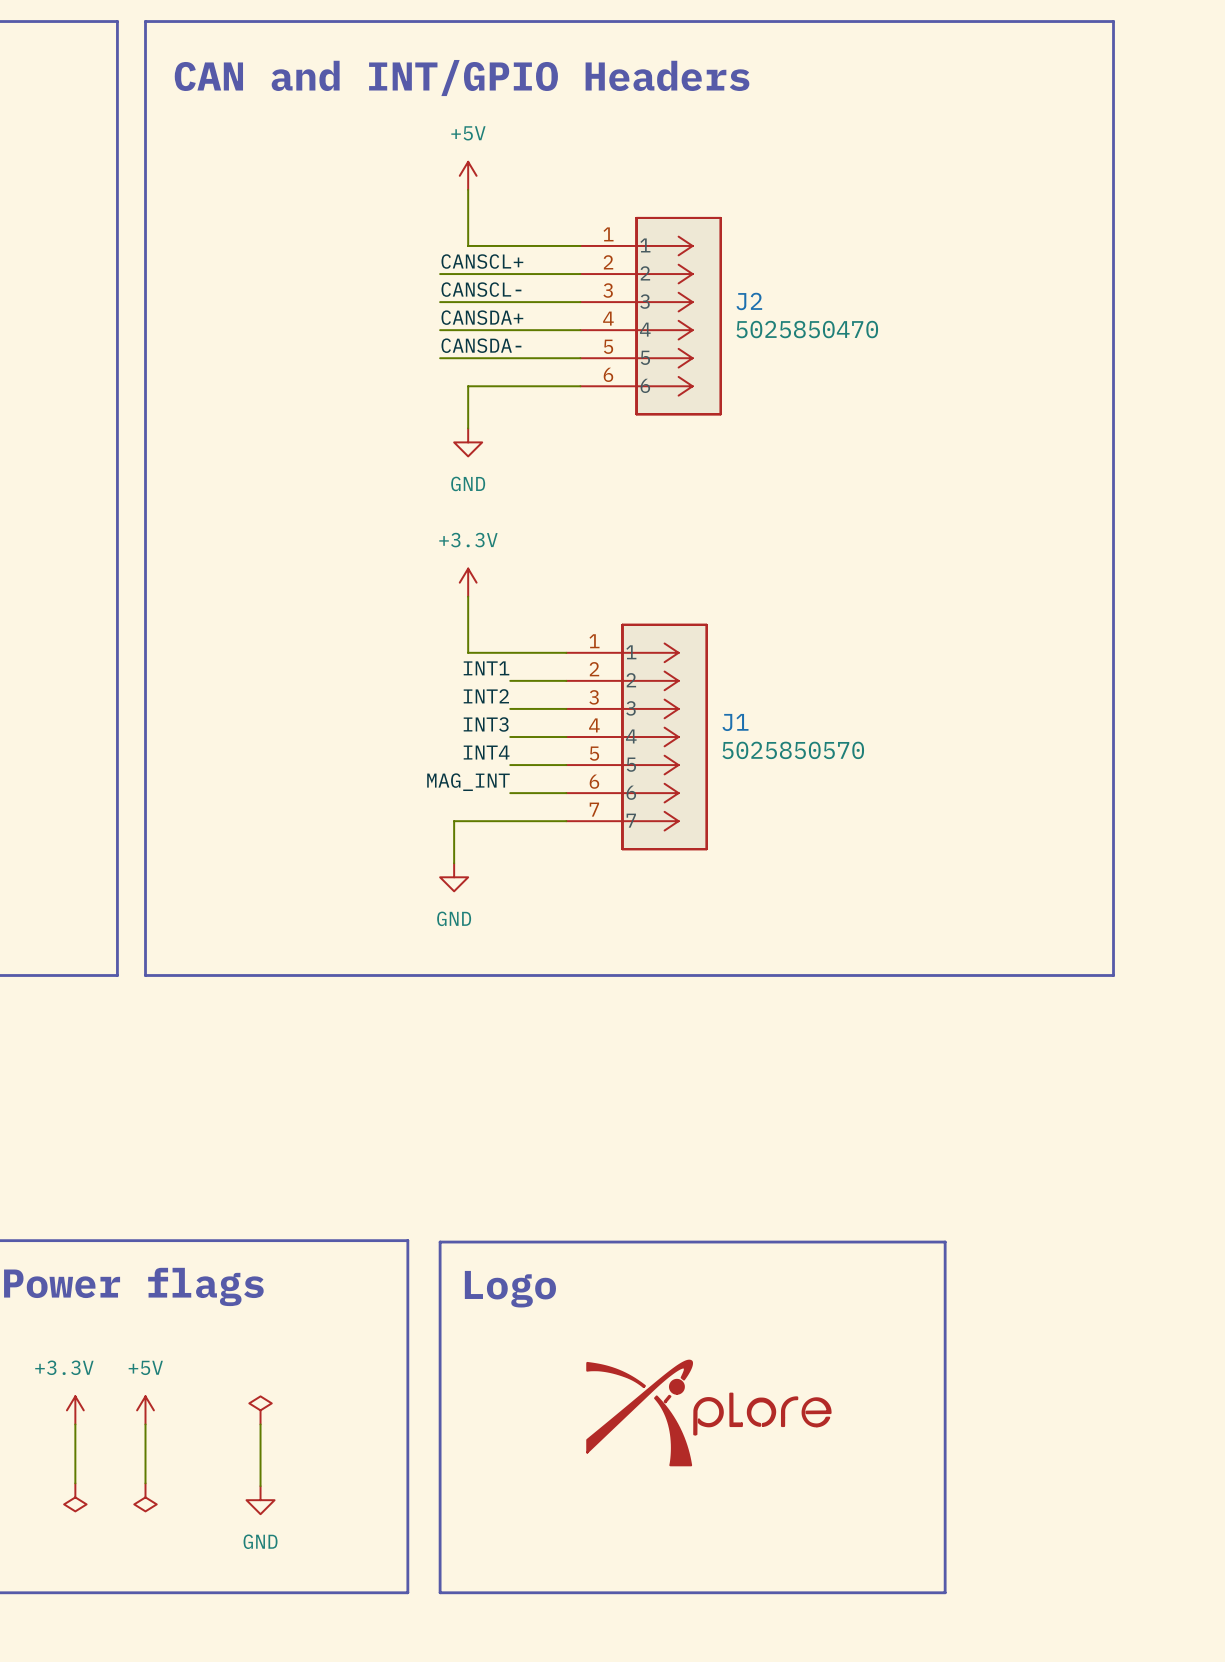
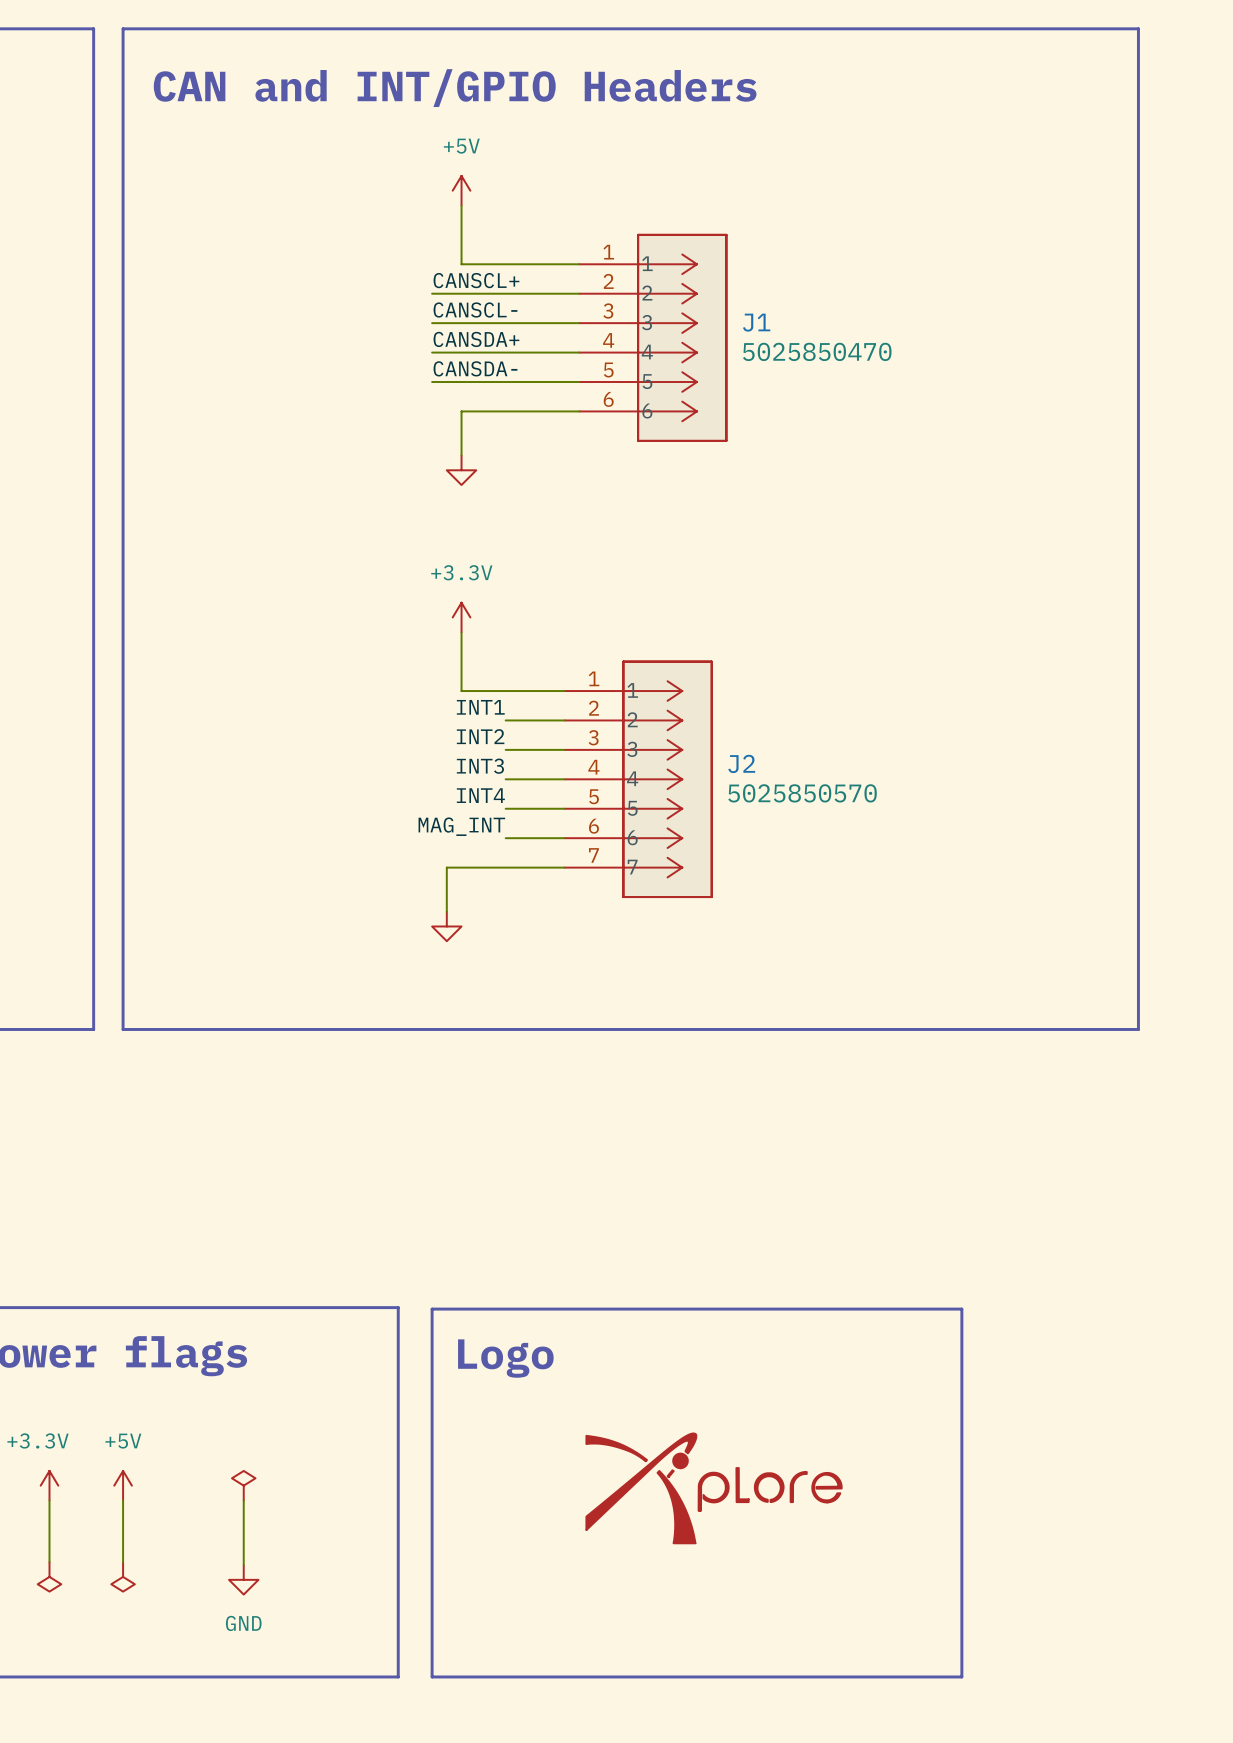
J2 name: J2 (749, 301) -> J1 (756, 322)
power symbol text: GND (468, 483) -> none
J1 name: J1 (735, 722) -> J2 (741, 763)
power symbol text: GND (454, 918) -> none

